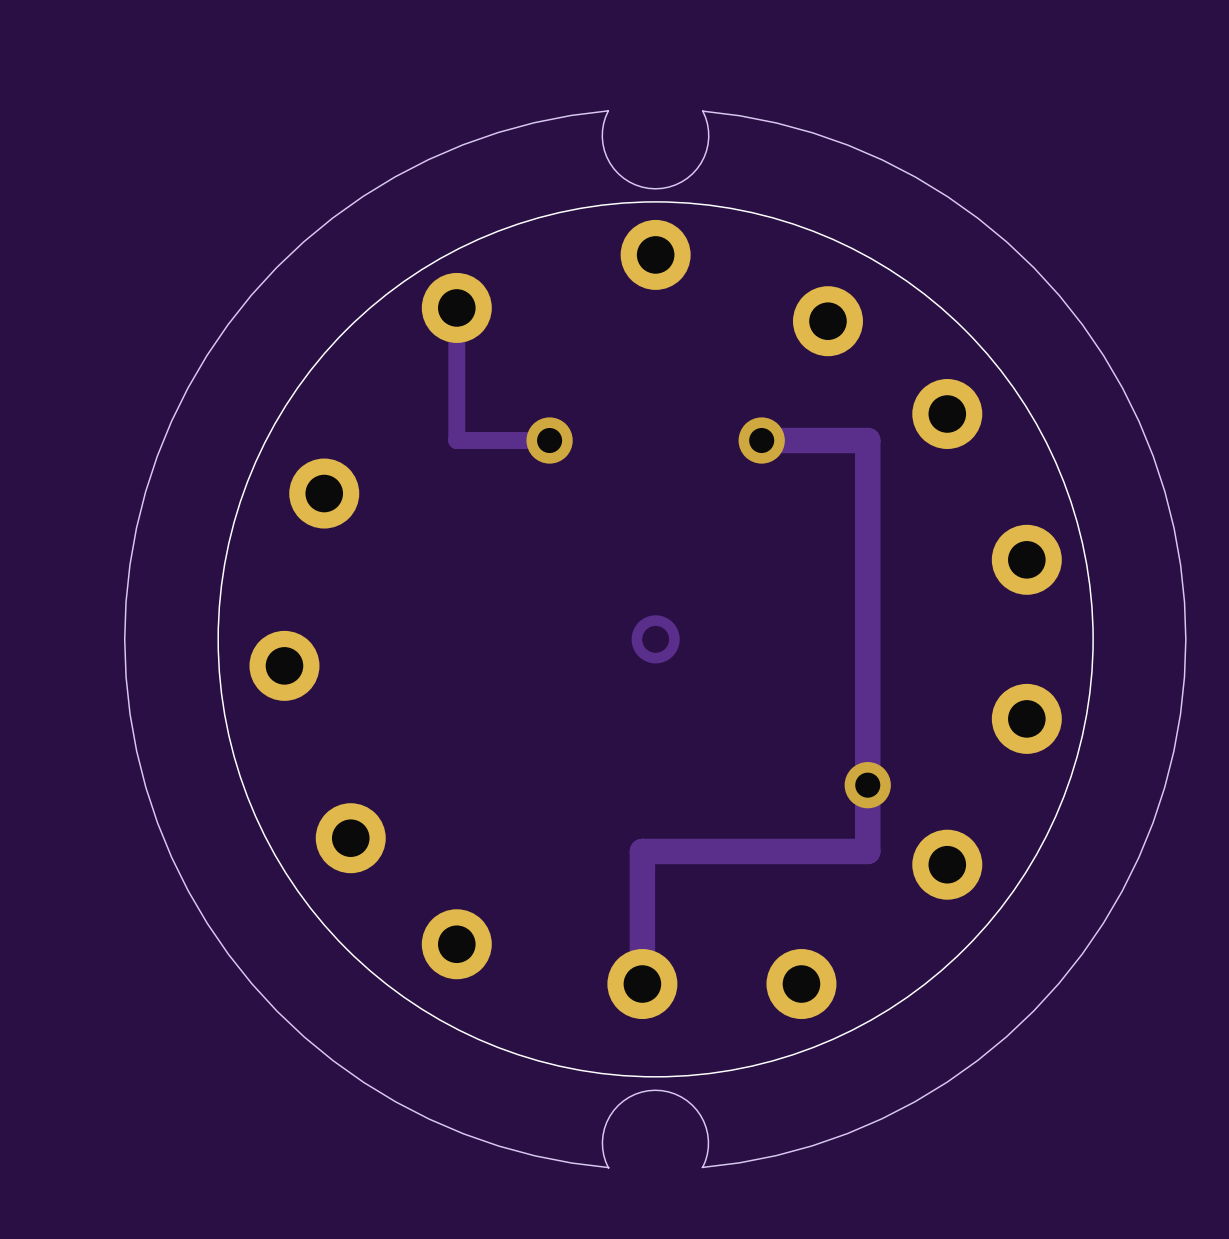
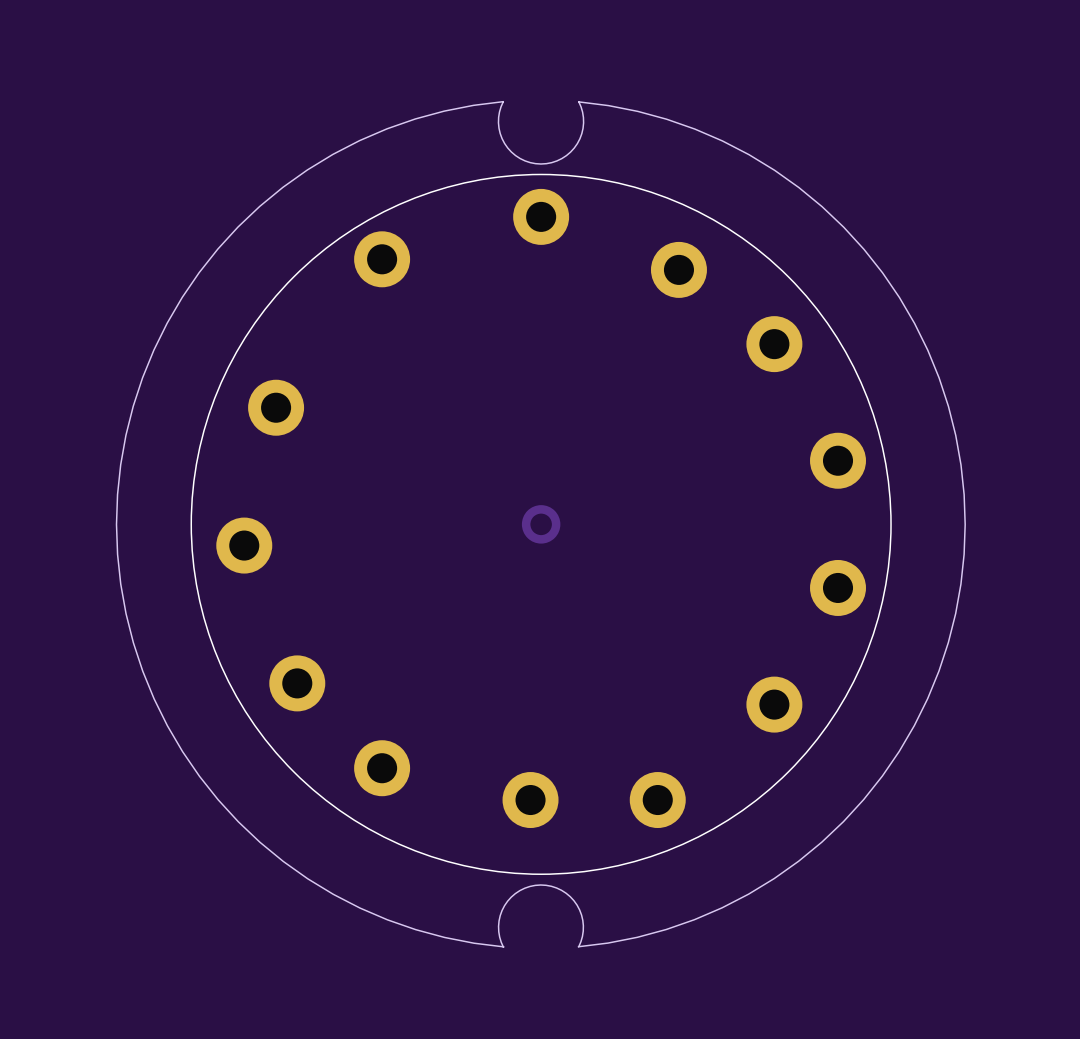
track: (456, 307) (456, 440) (549, 440) -> none
via: (549, 440) -> none
track: (761, 440) (867, 440) (867, 851) (642, 851) (642, 984) -> none
via: (761, 440) -> none
via: (867, 785) -> none

